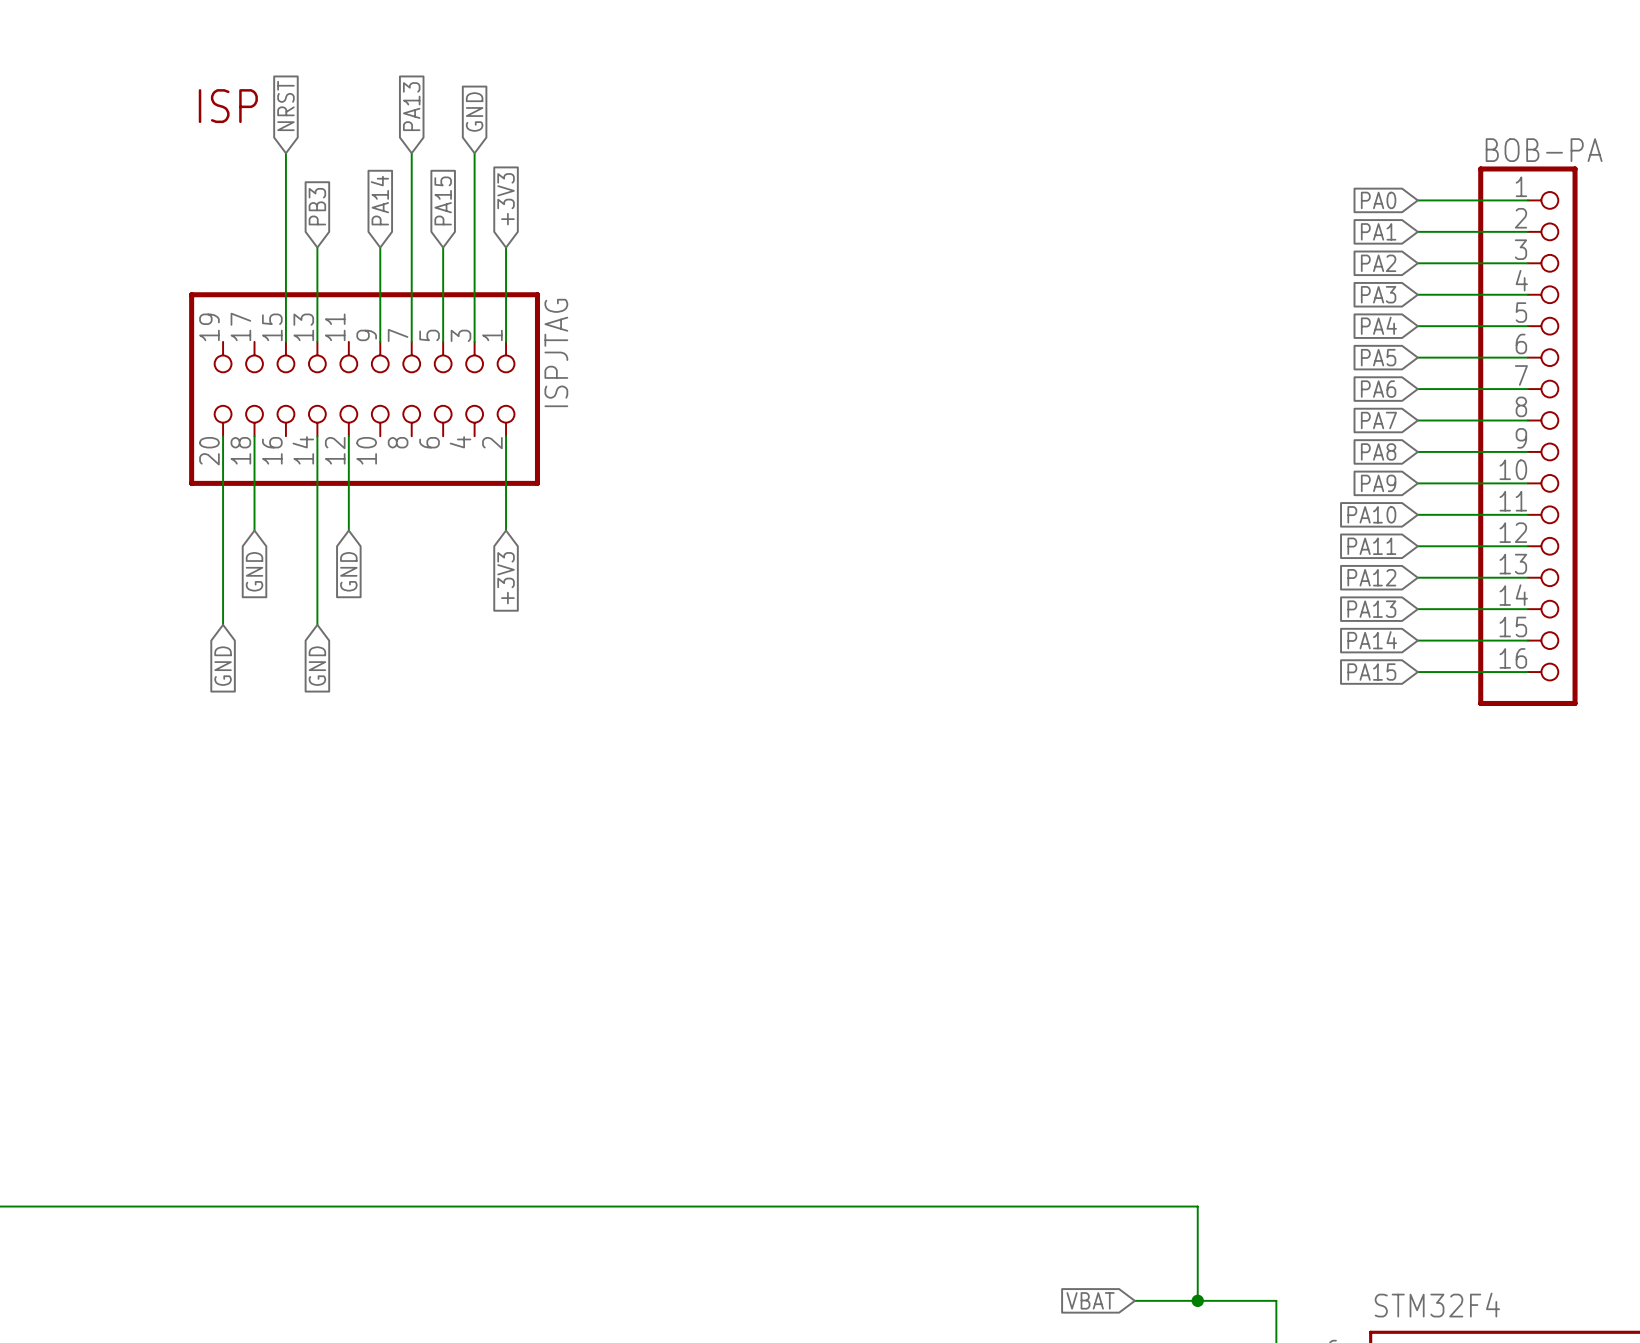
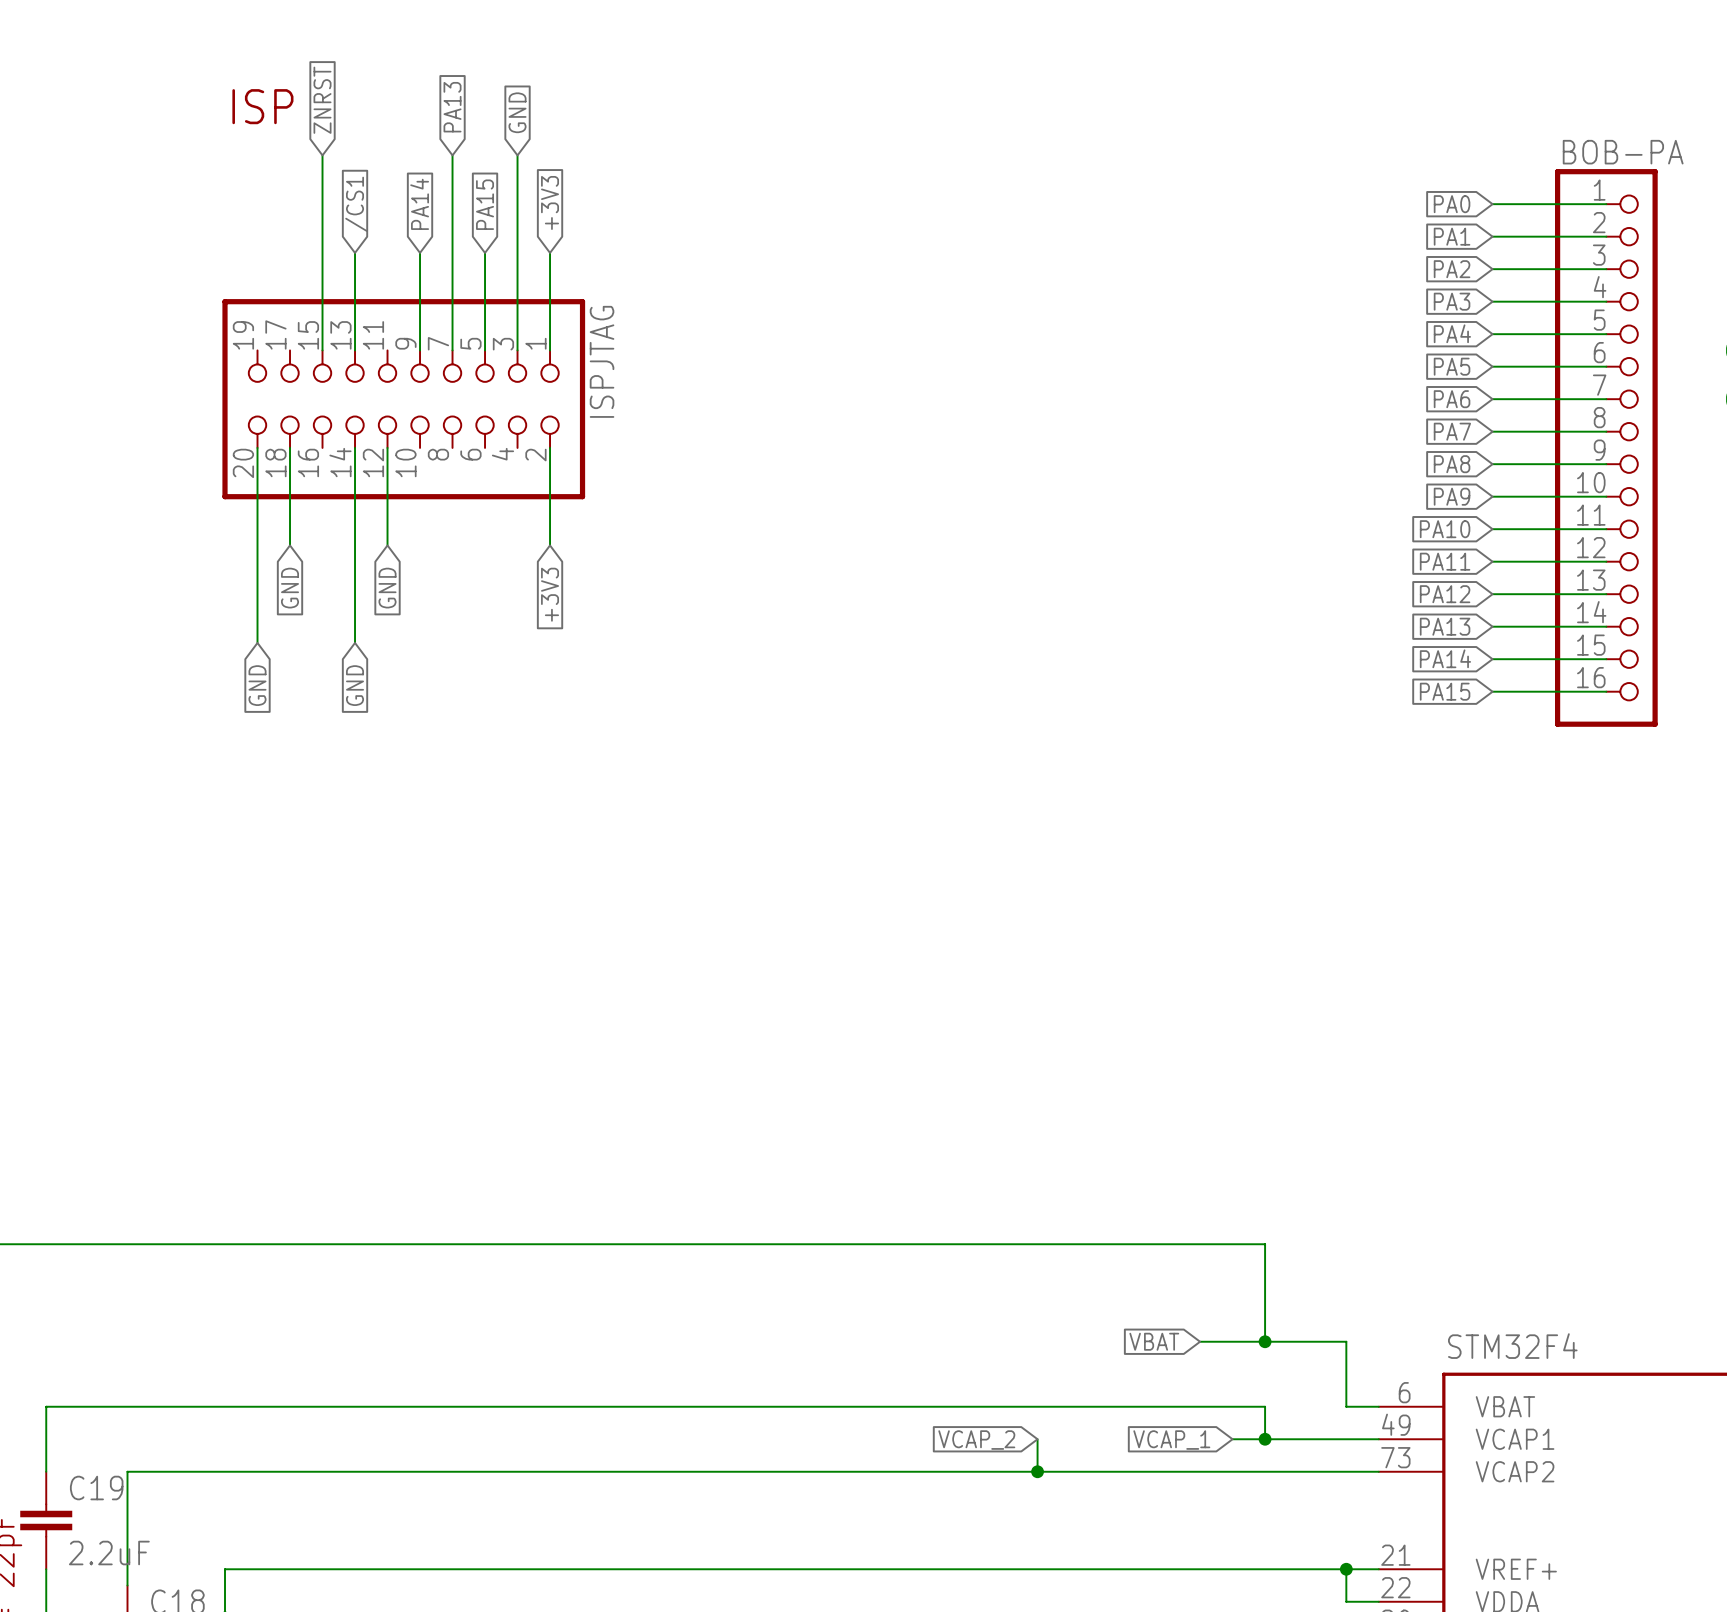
global label: NRST (285, 105) -> ZNRST (322, 100)
global label: PB3 (317, 206) -> /CS1 (356, 204)

